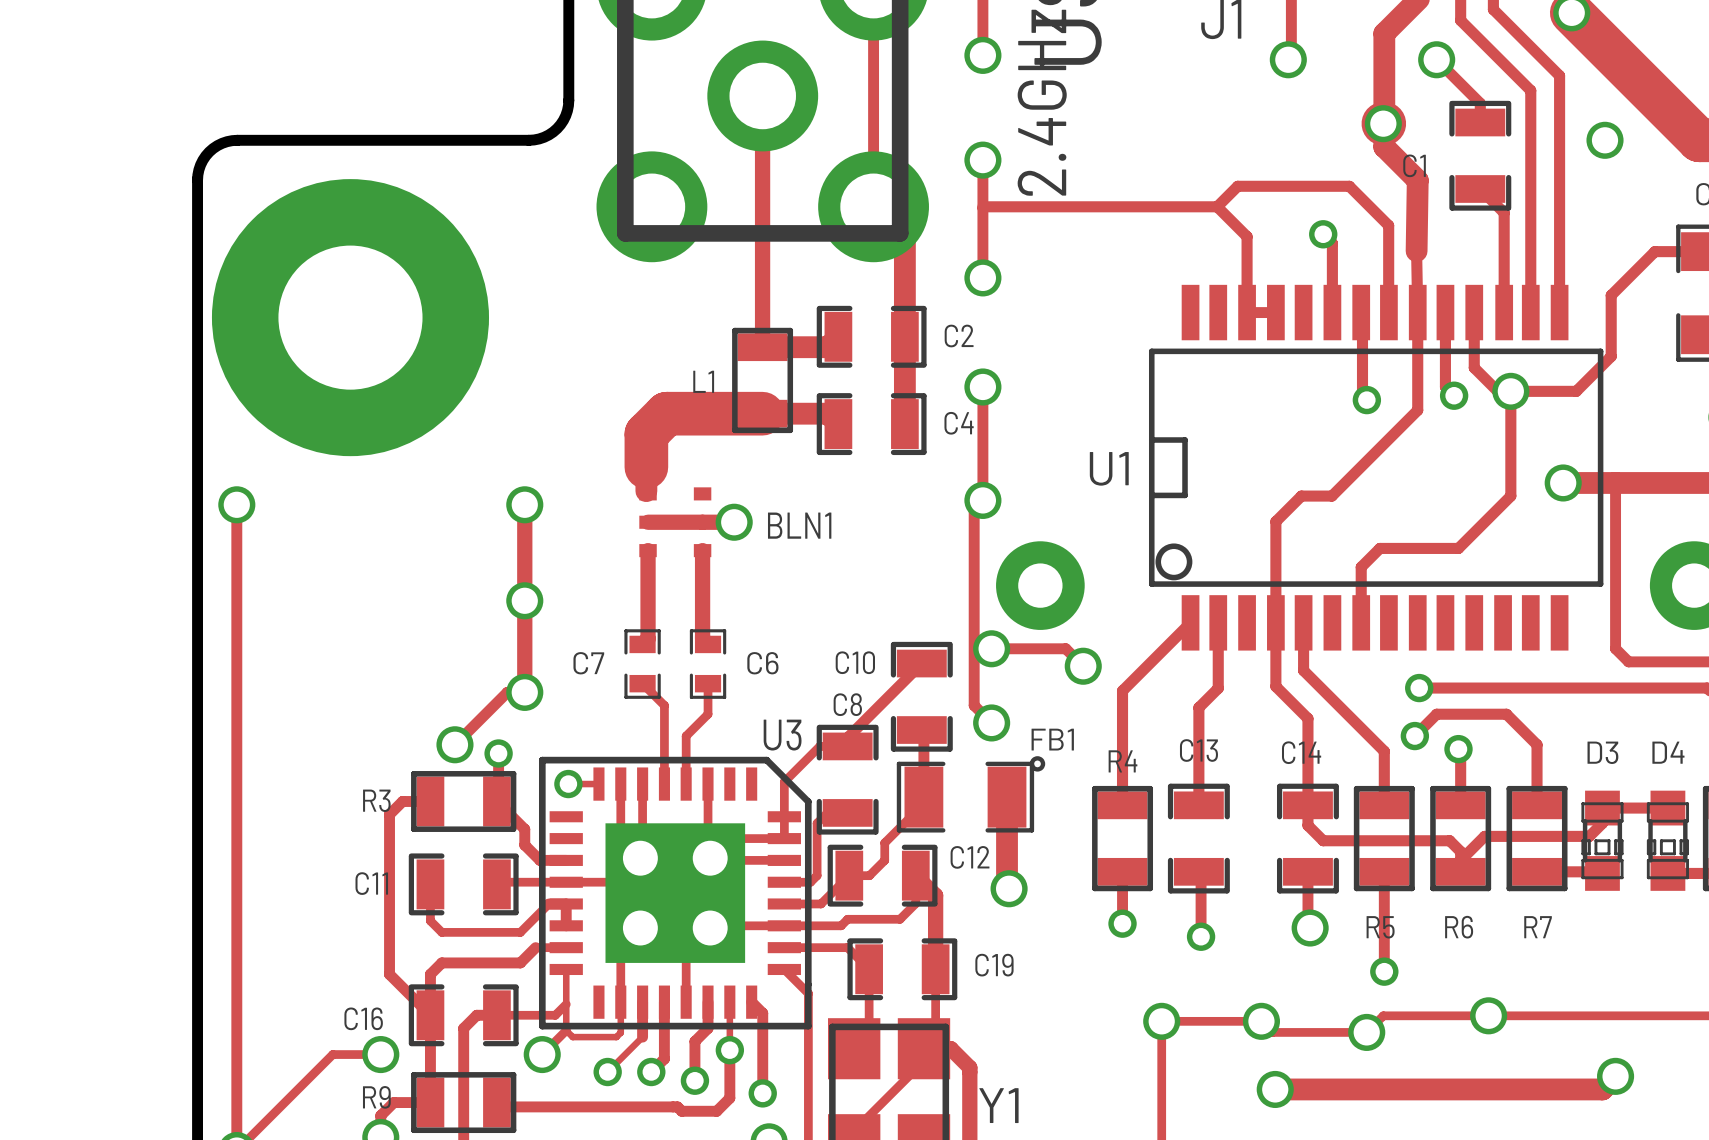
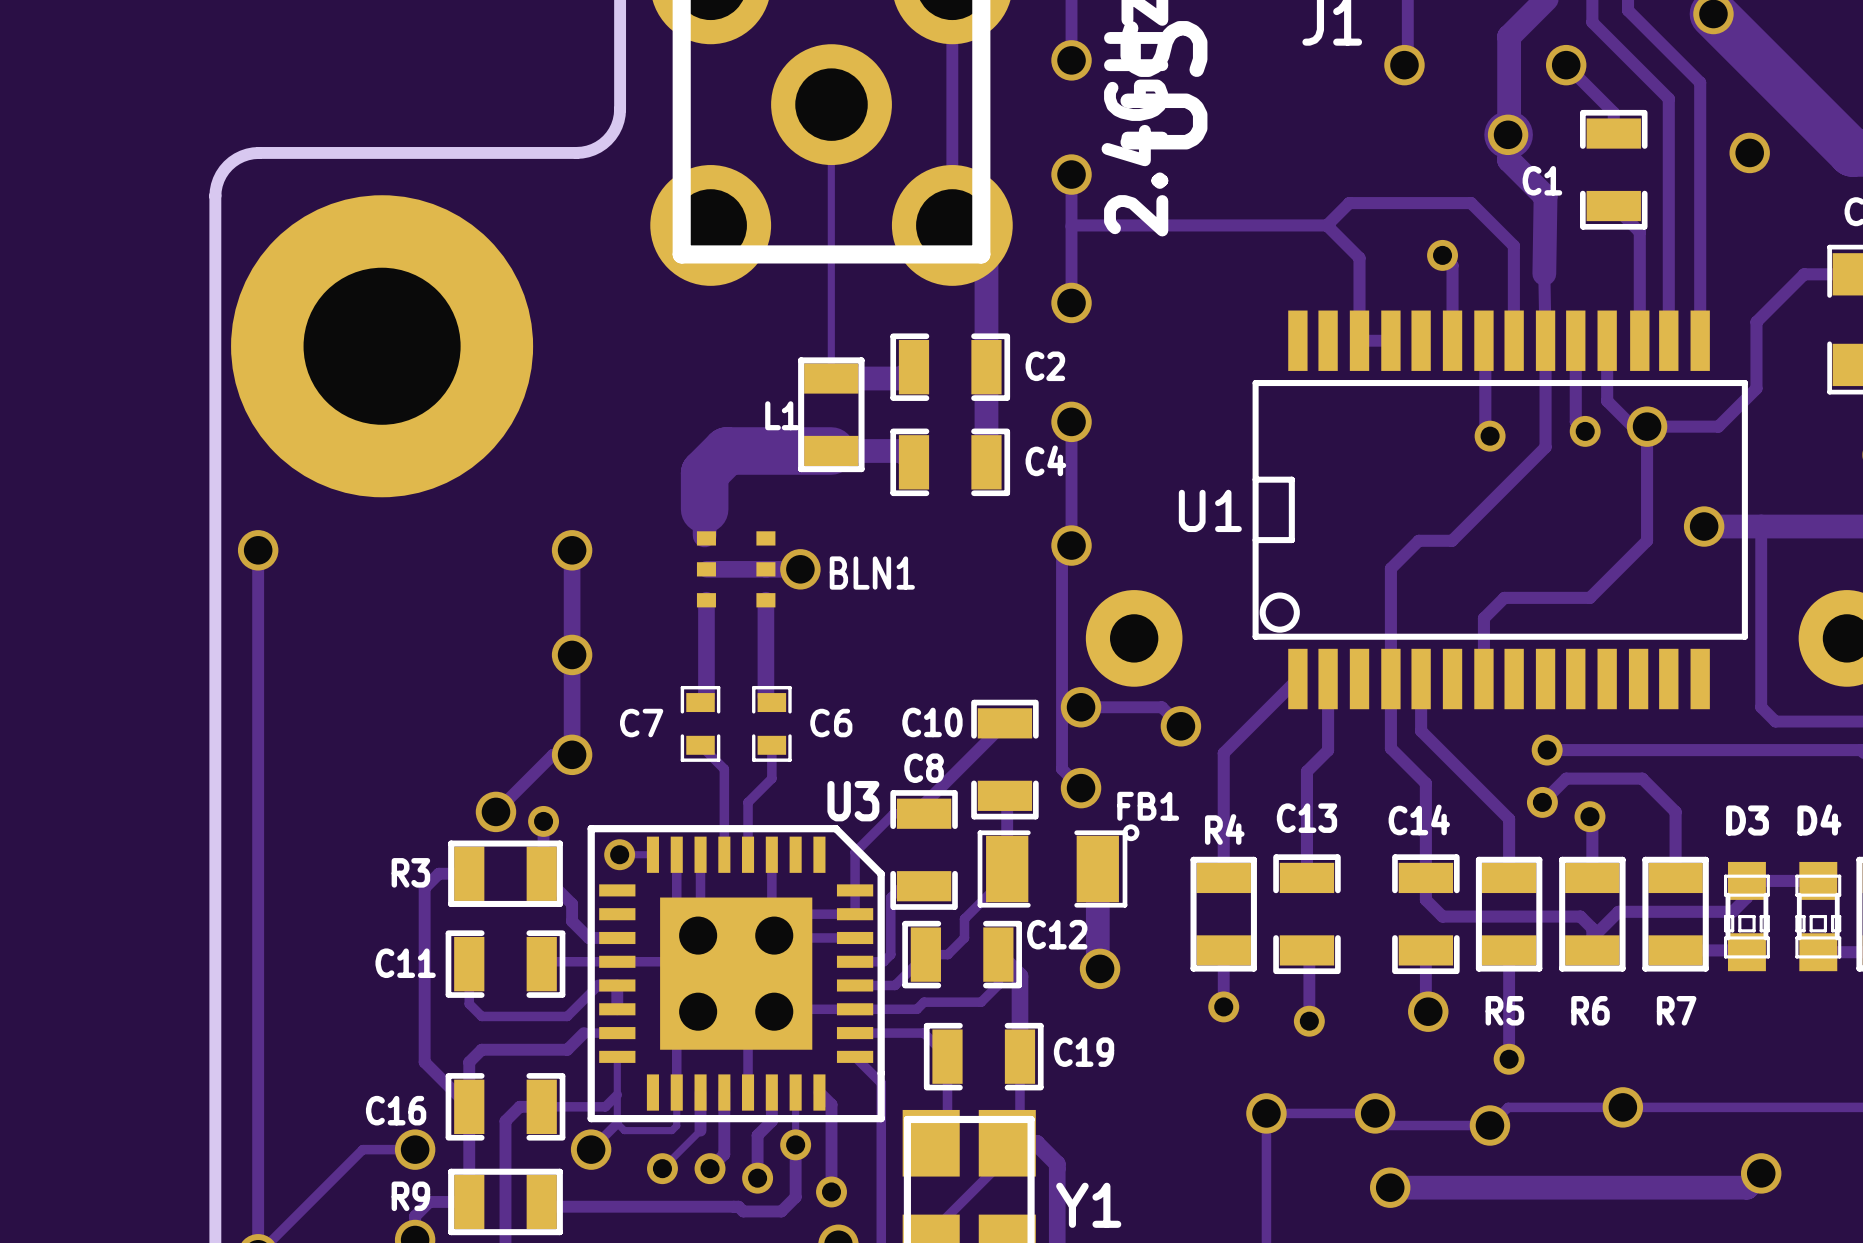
track width: thick (762, 96) (762, 347) -> thin (831, 104) (831, 378)
L1 name position: L1 (703, 381) -> L1 (782, 415)

